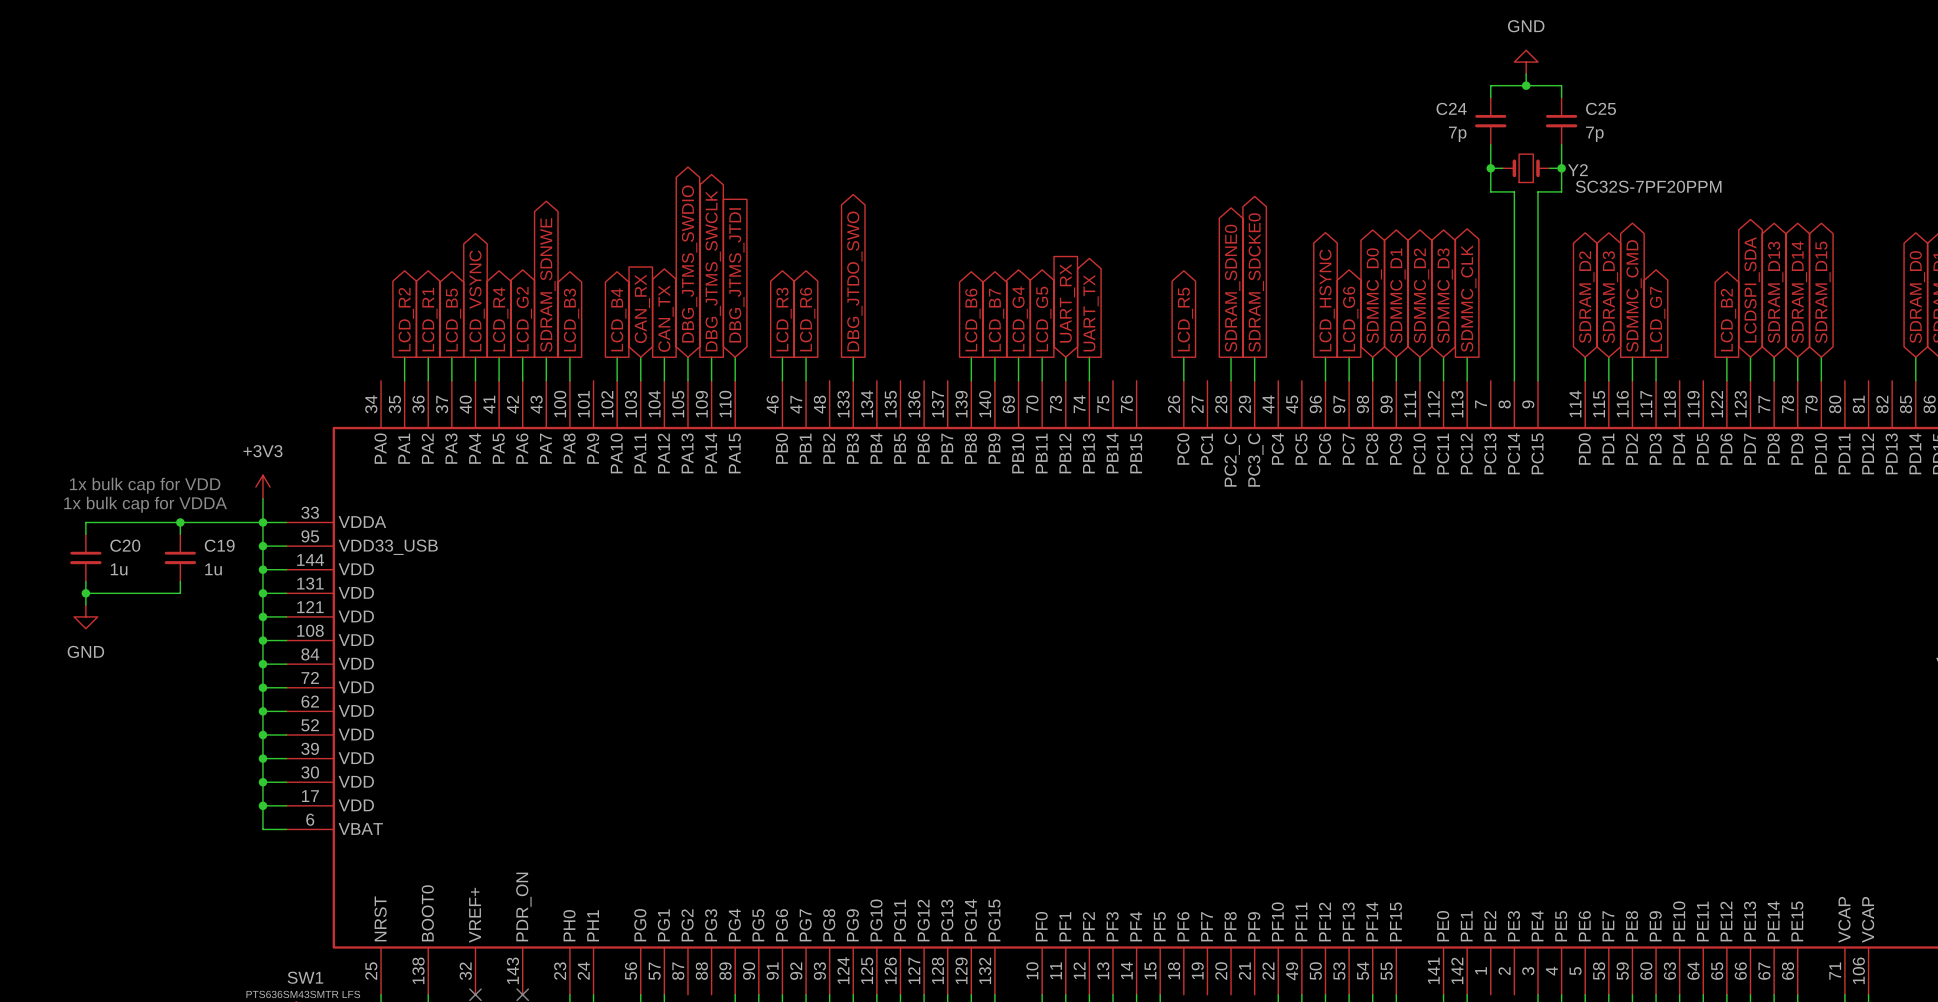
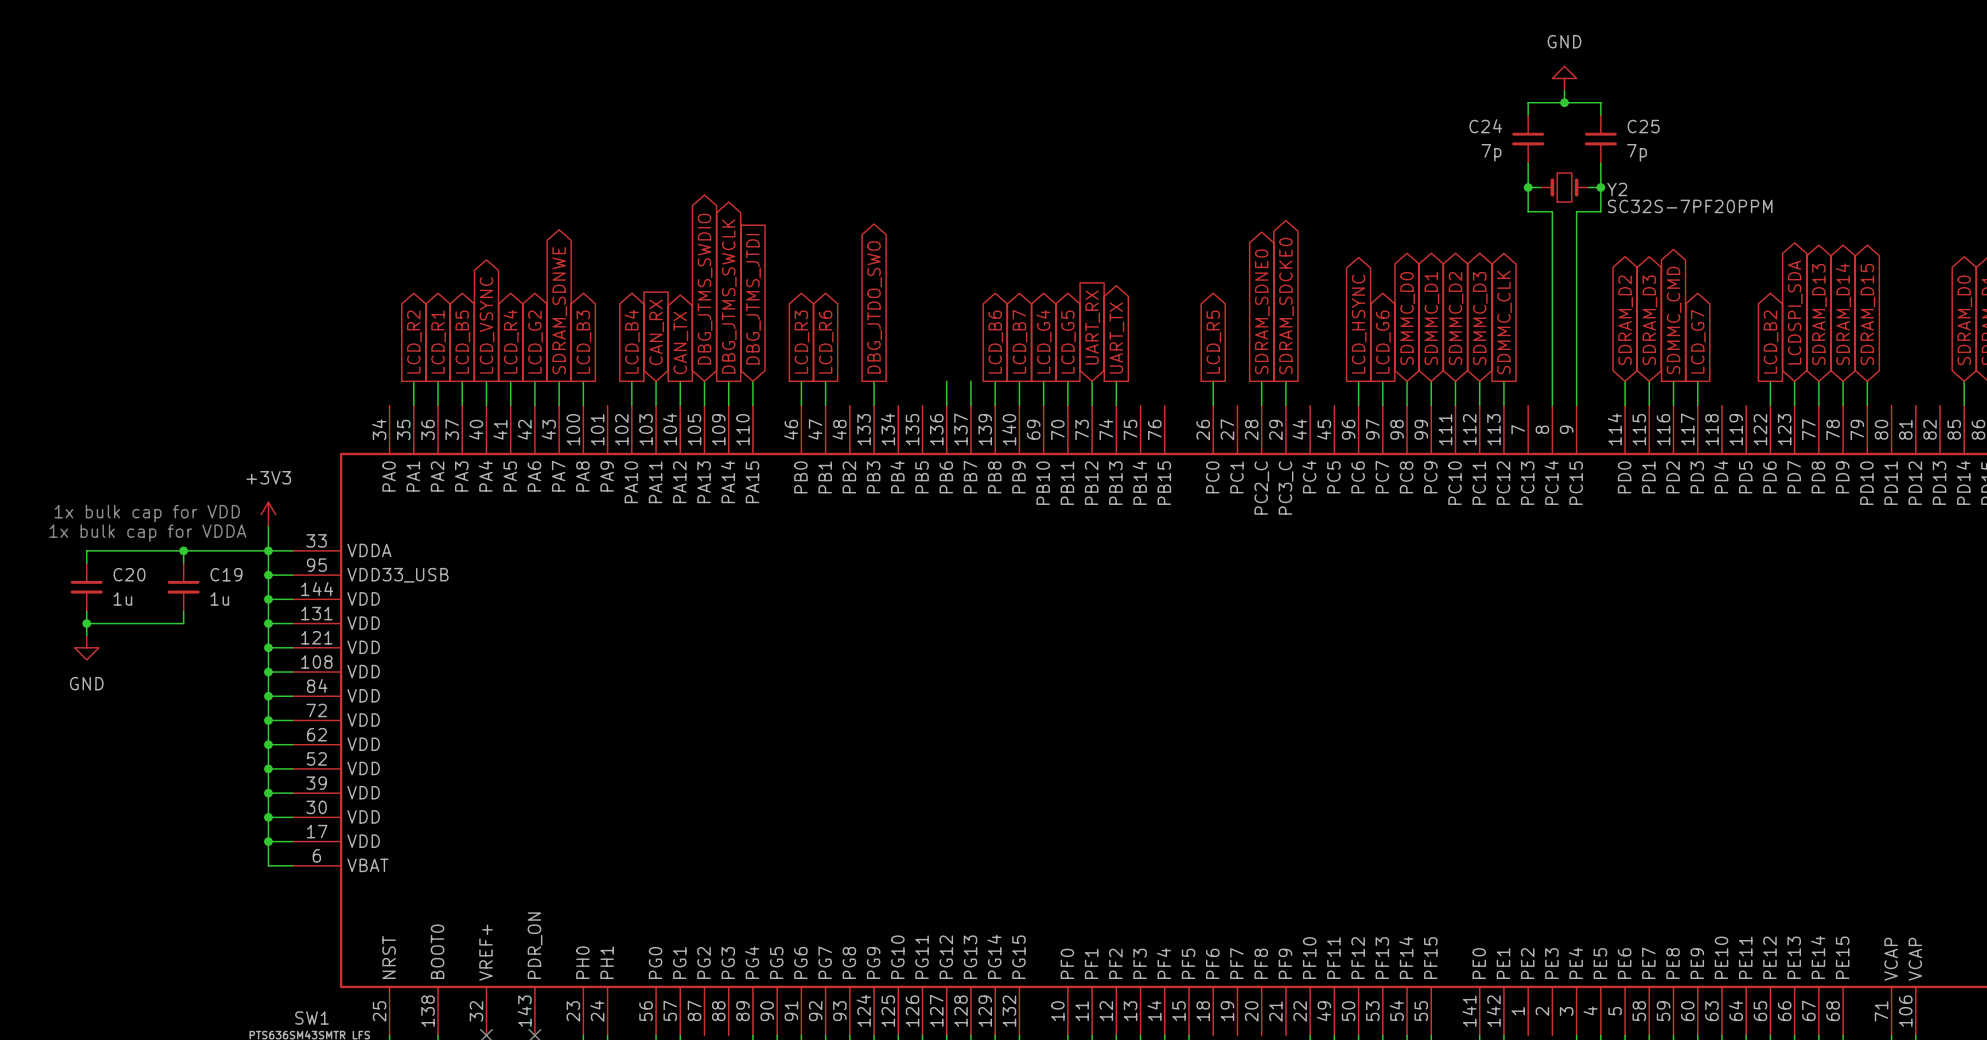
wire: none -> (946, 381) (946, 405)
wire: none -> (970, 381) (970, 405)

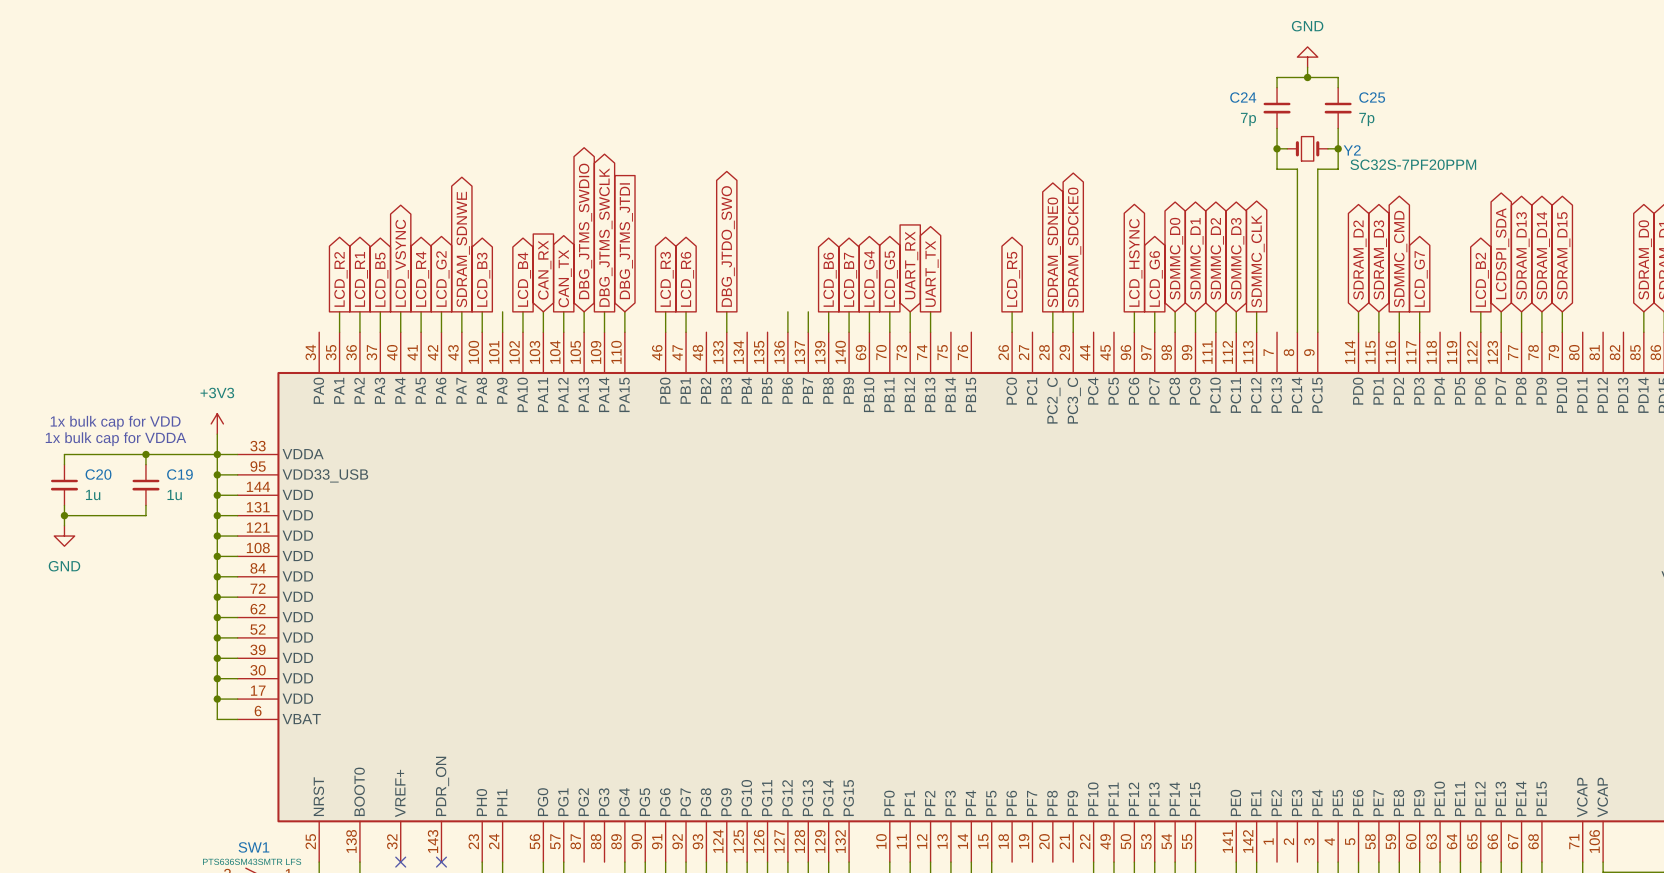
wire: none -> (502, 311) (502, 332)

